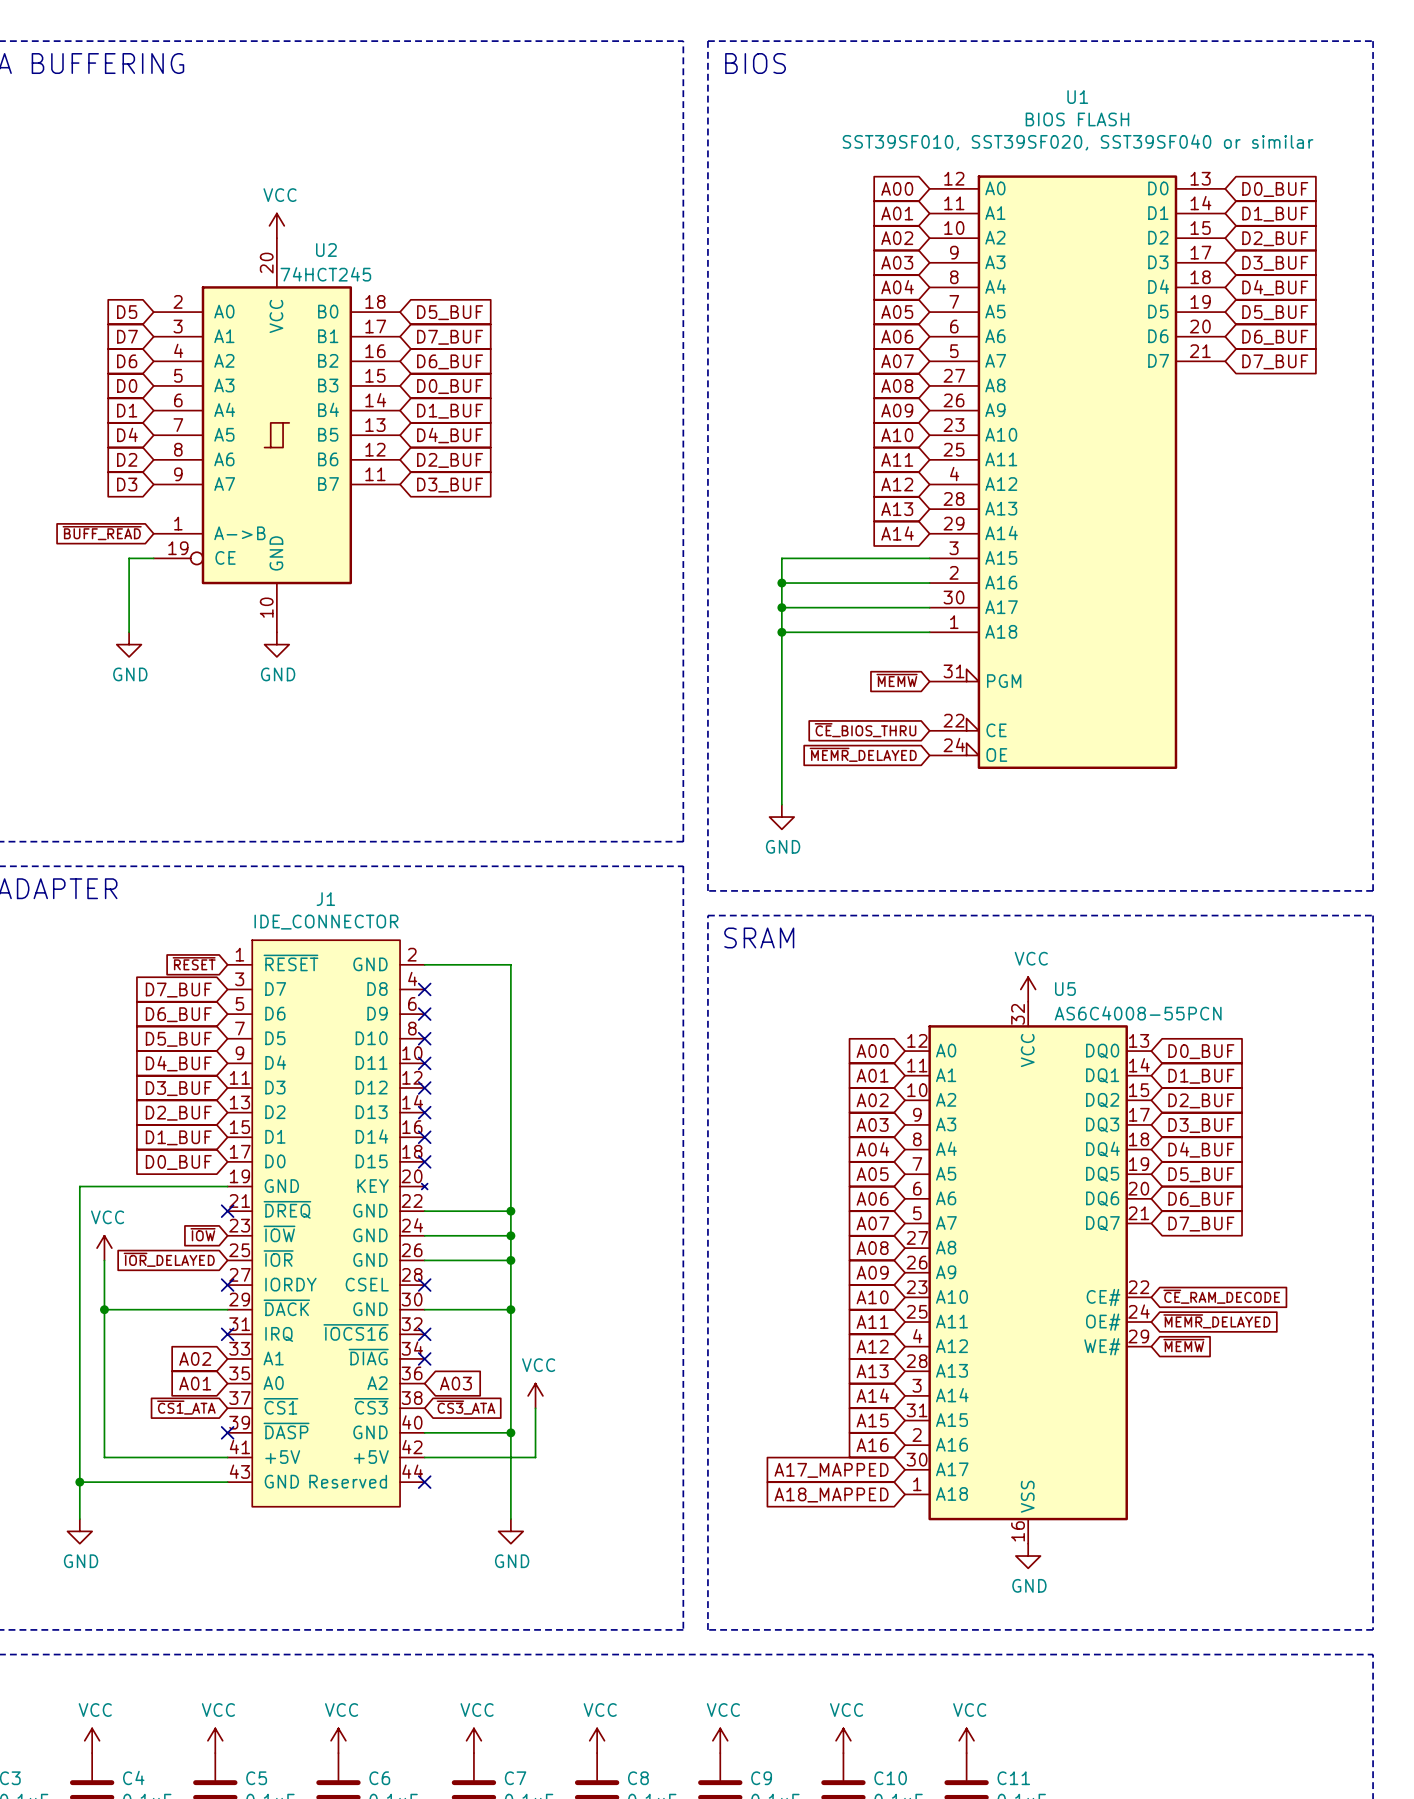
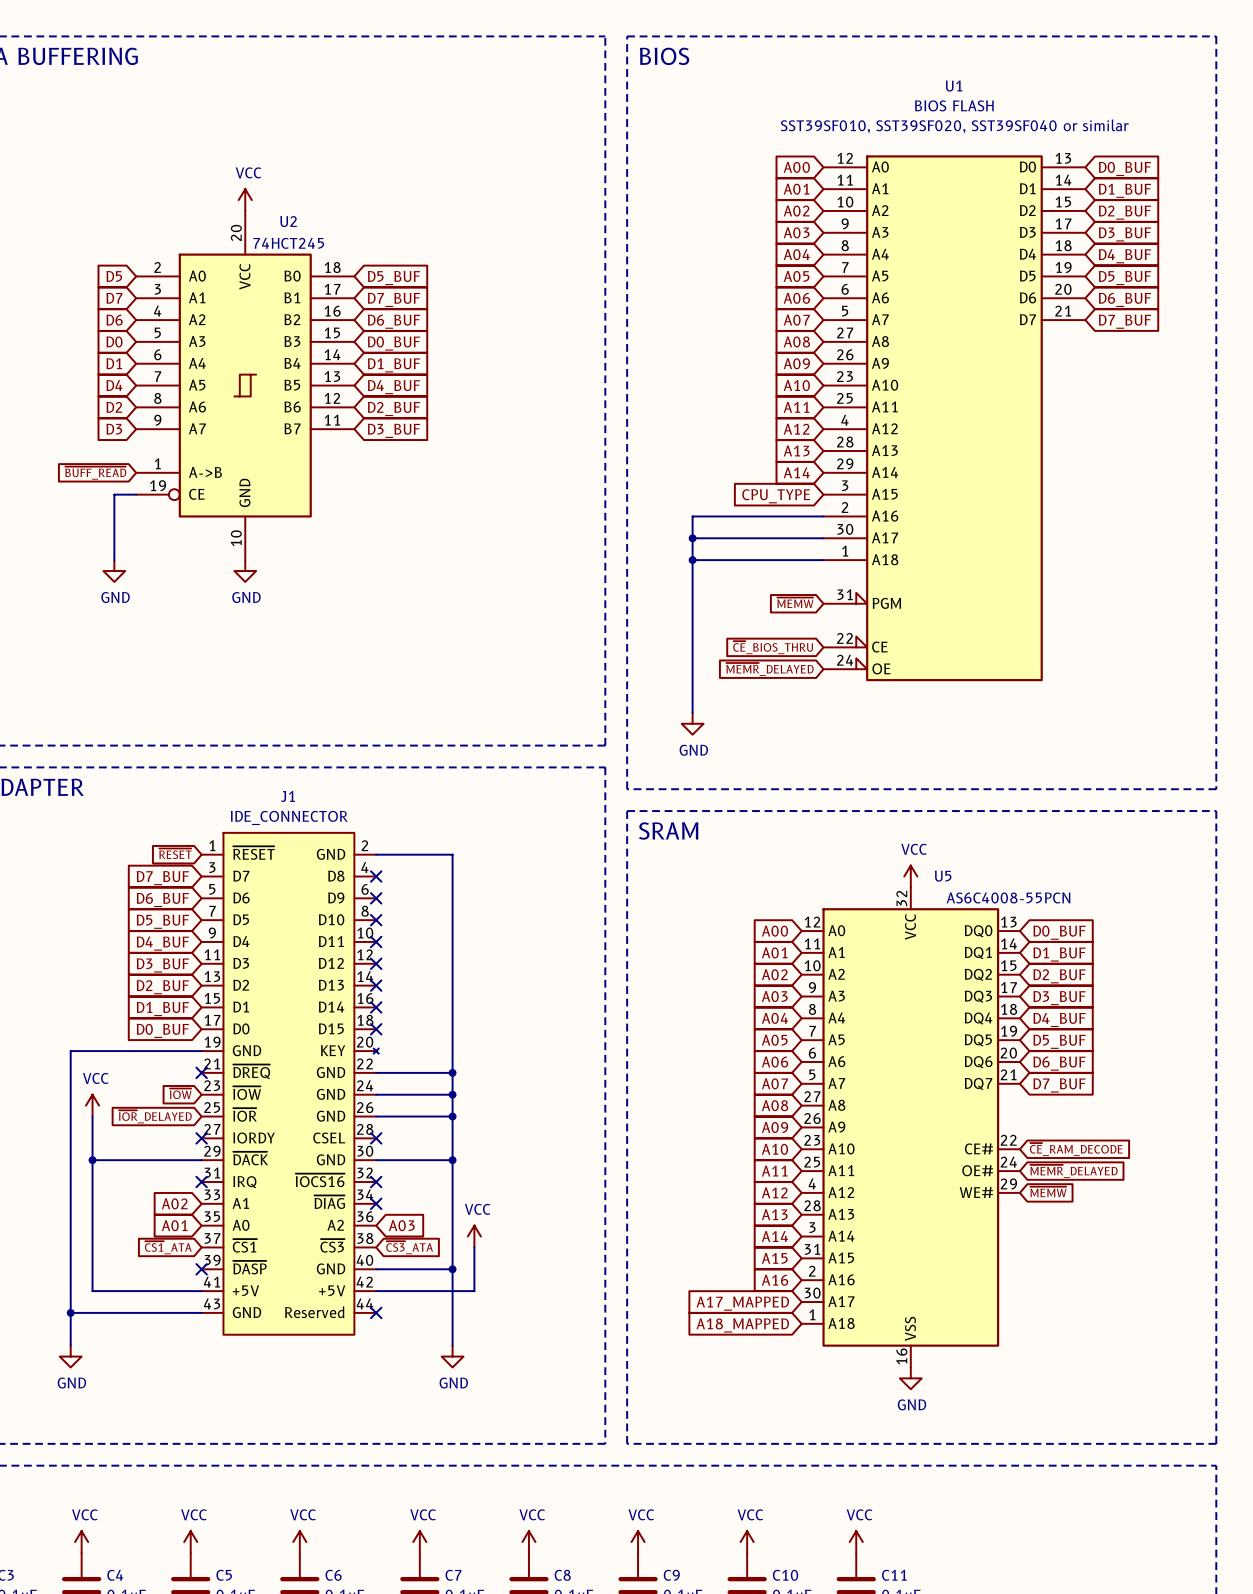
global label: none -> CPU_TYPE (776, 496)
wire: (929, 558) (781, 558) (781, 583) -> none
junction: (781, 583) -> none

